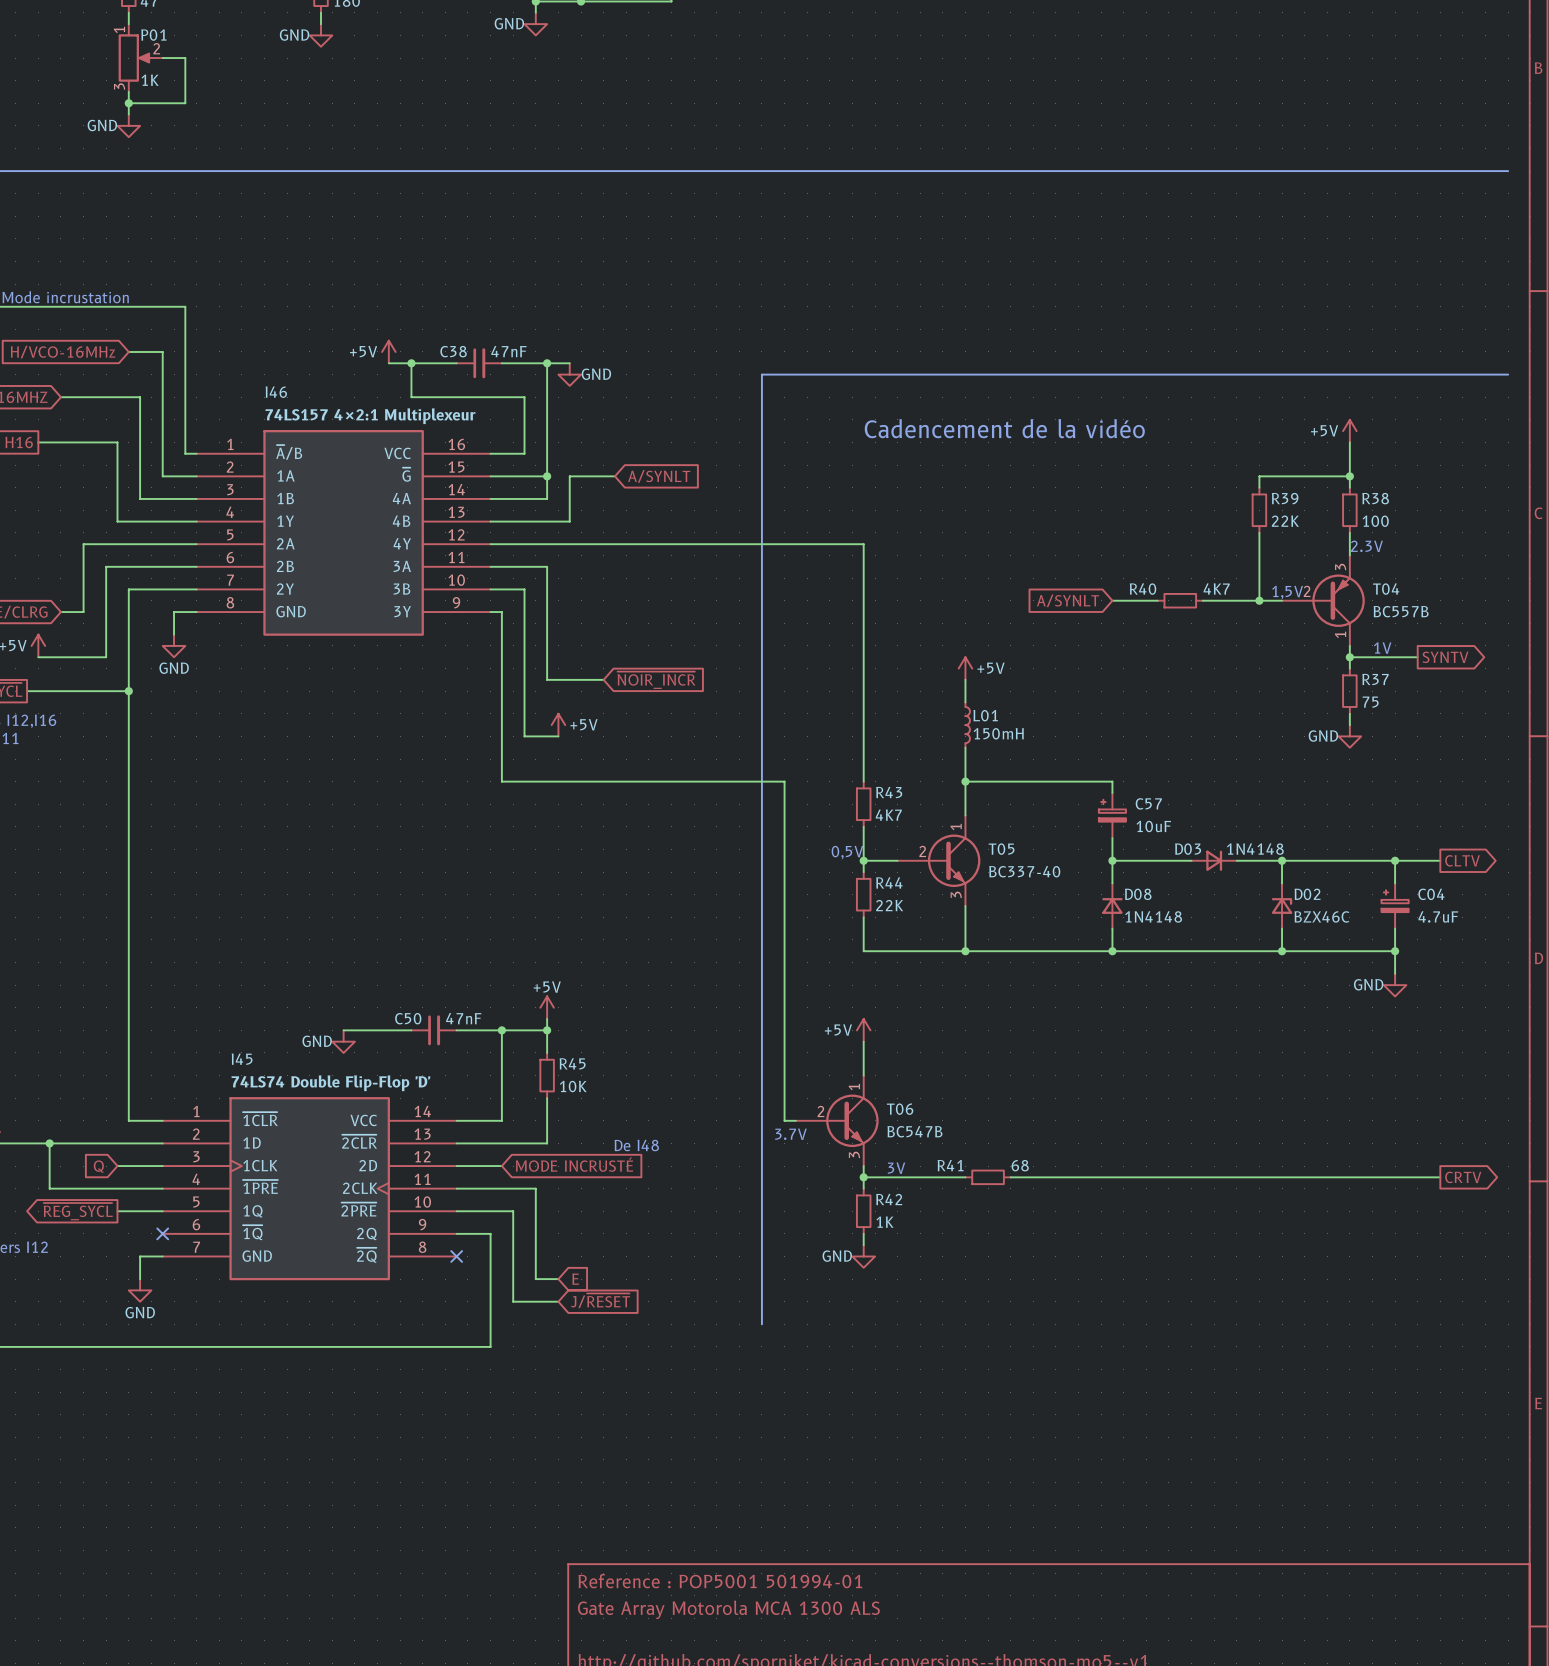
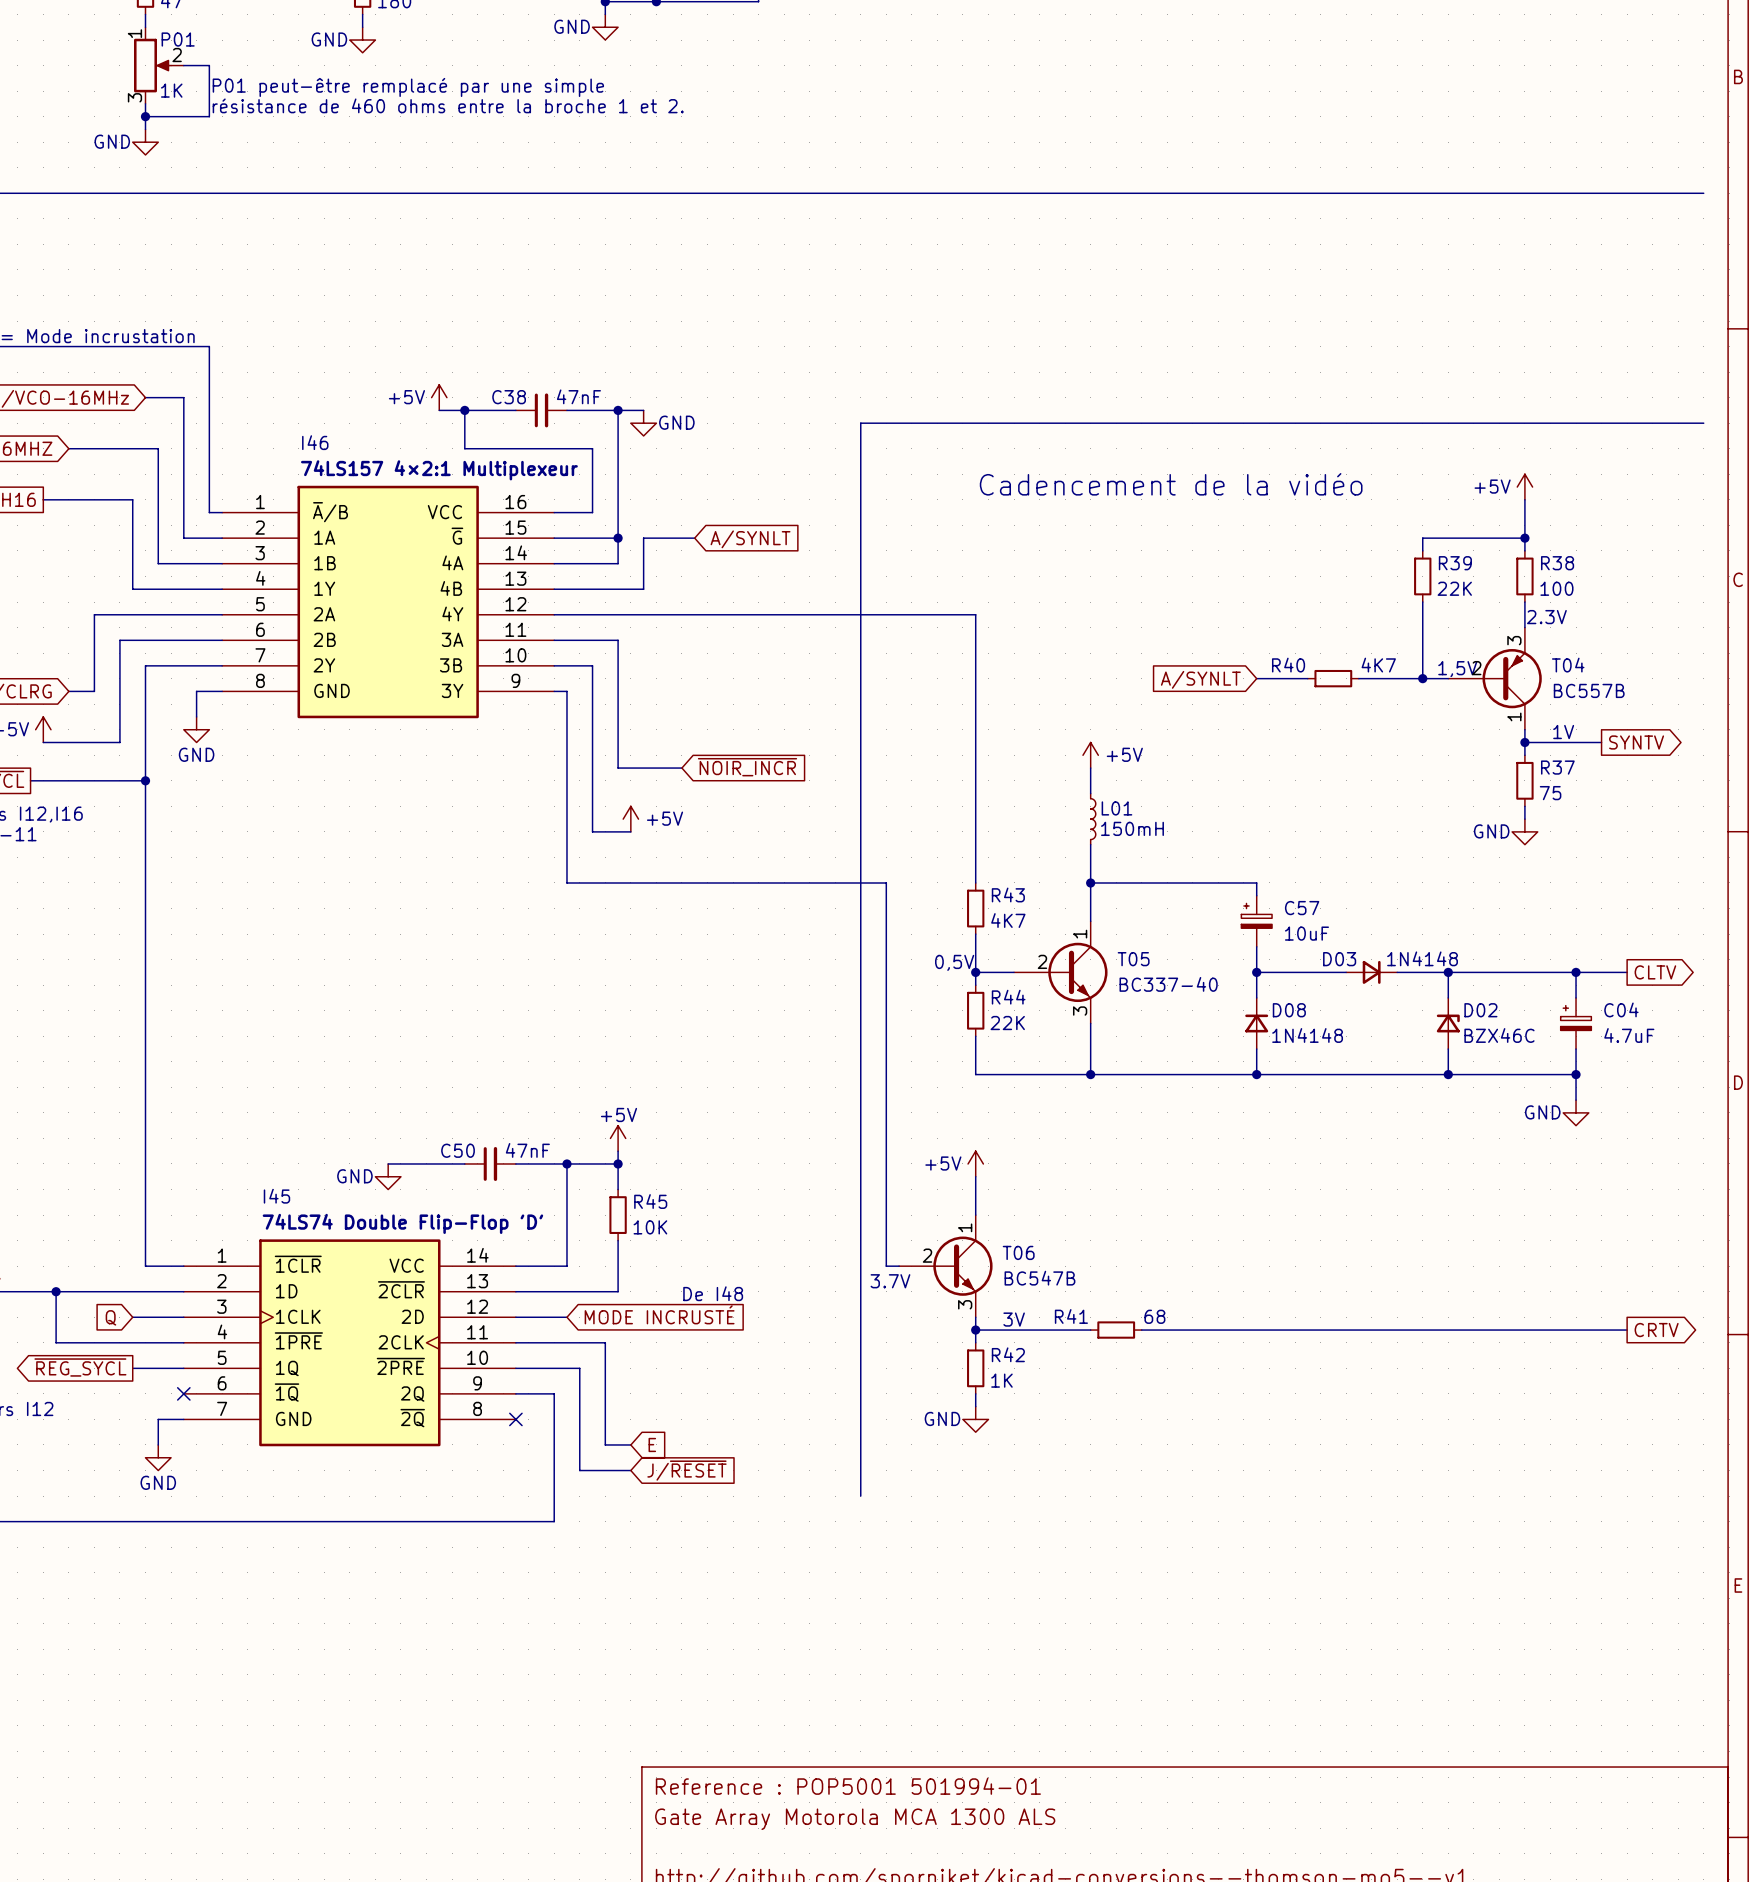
text: none -> P01 peut-être remplacé par une simple (408, 87)
text: none -> résistance de 460 ohms entre la broche 1 et 2. (448, 105)

